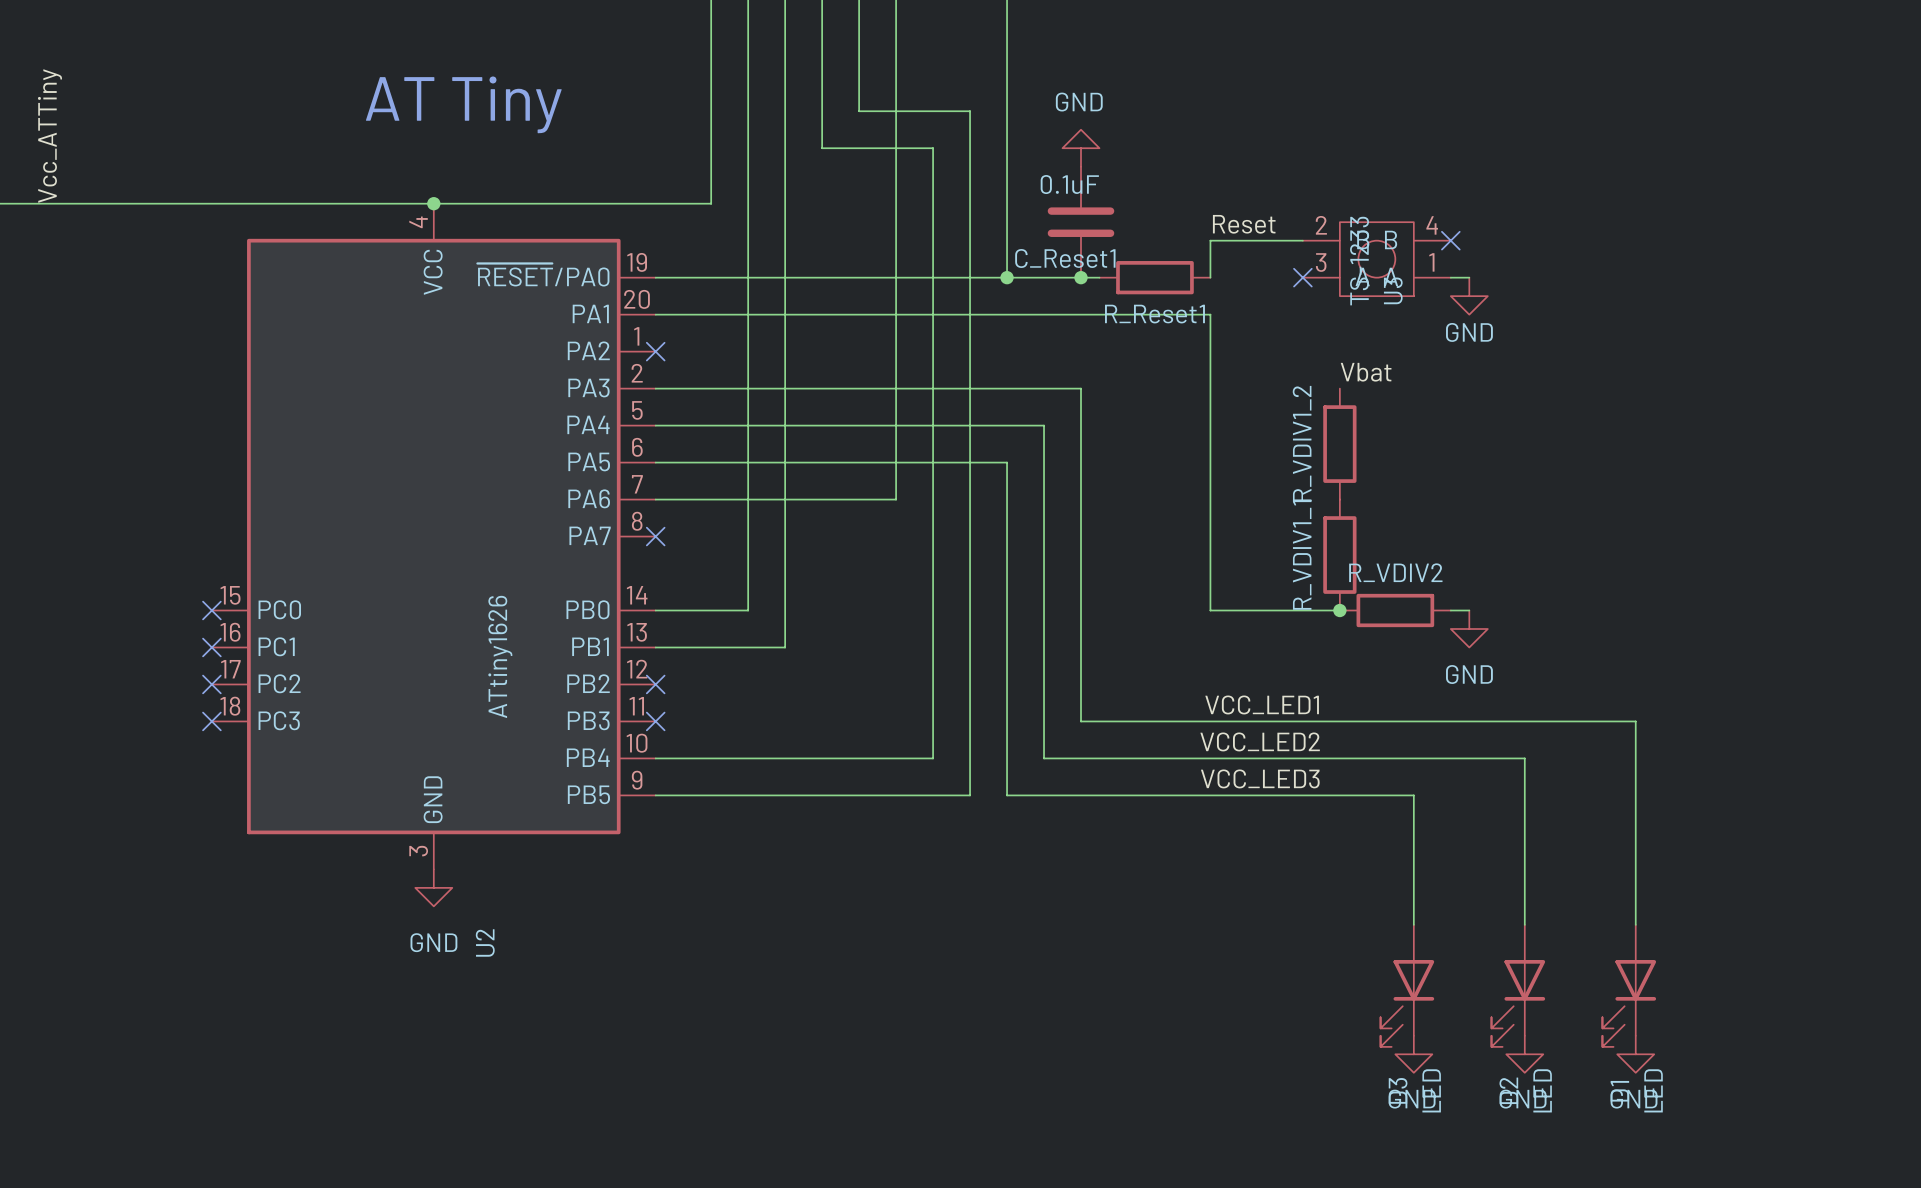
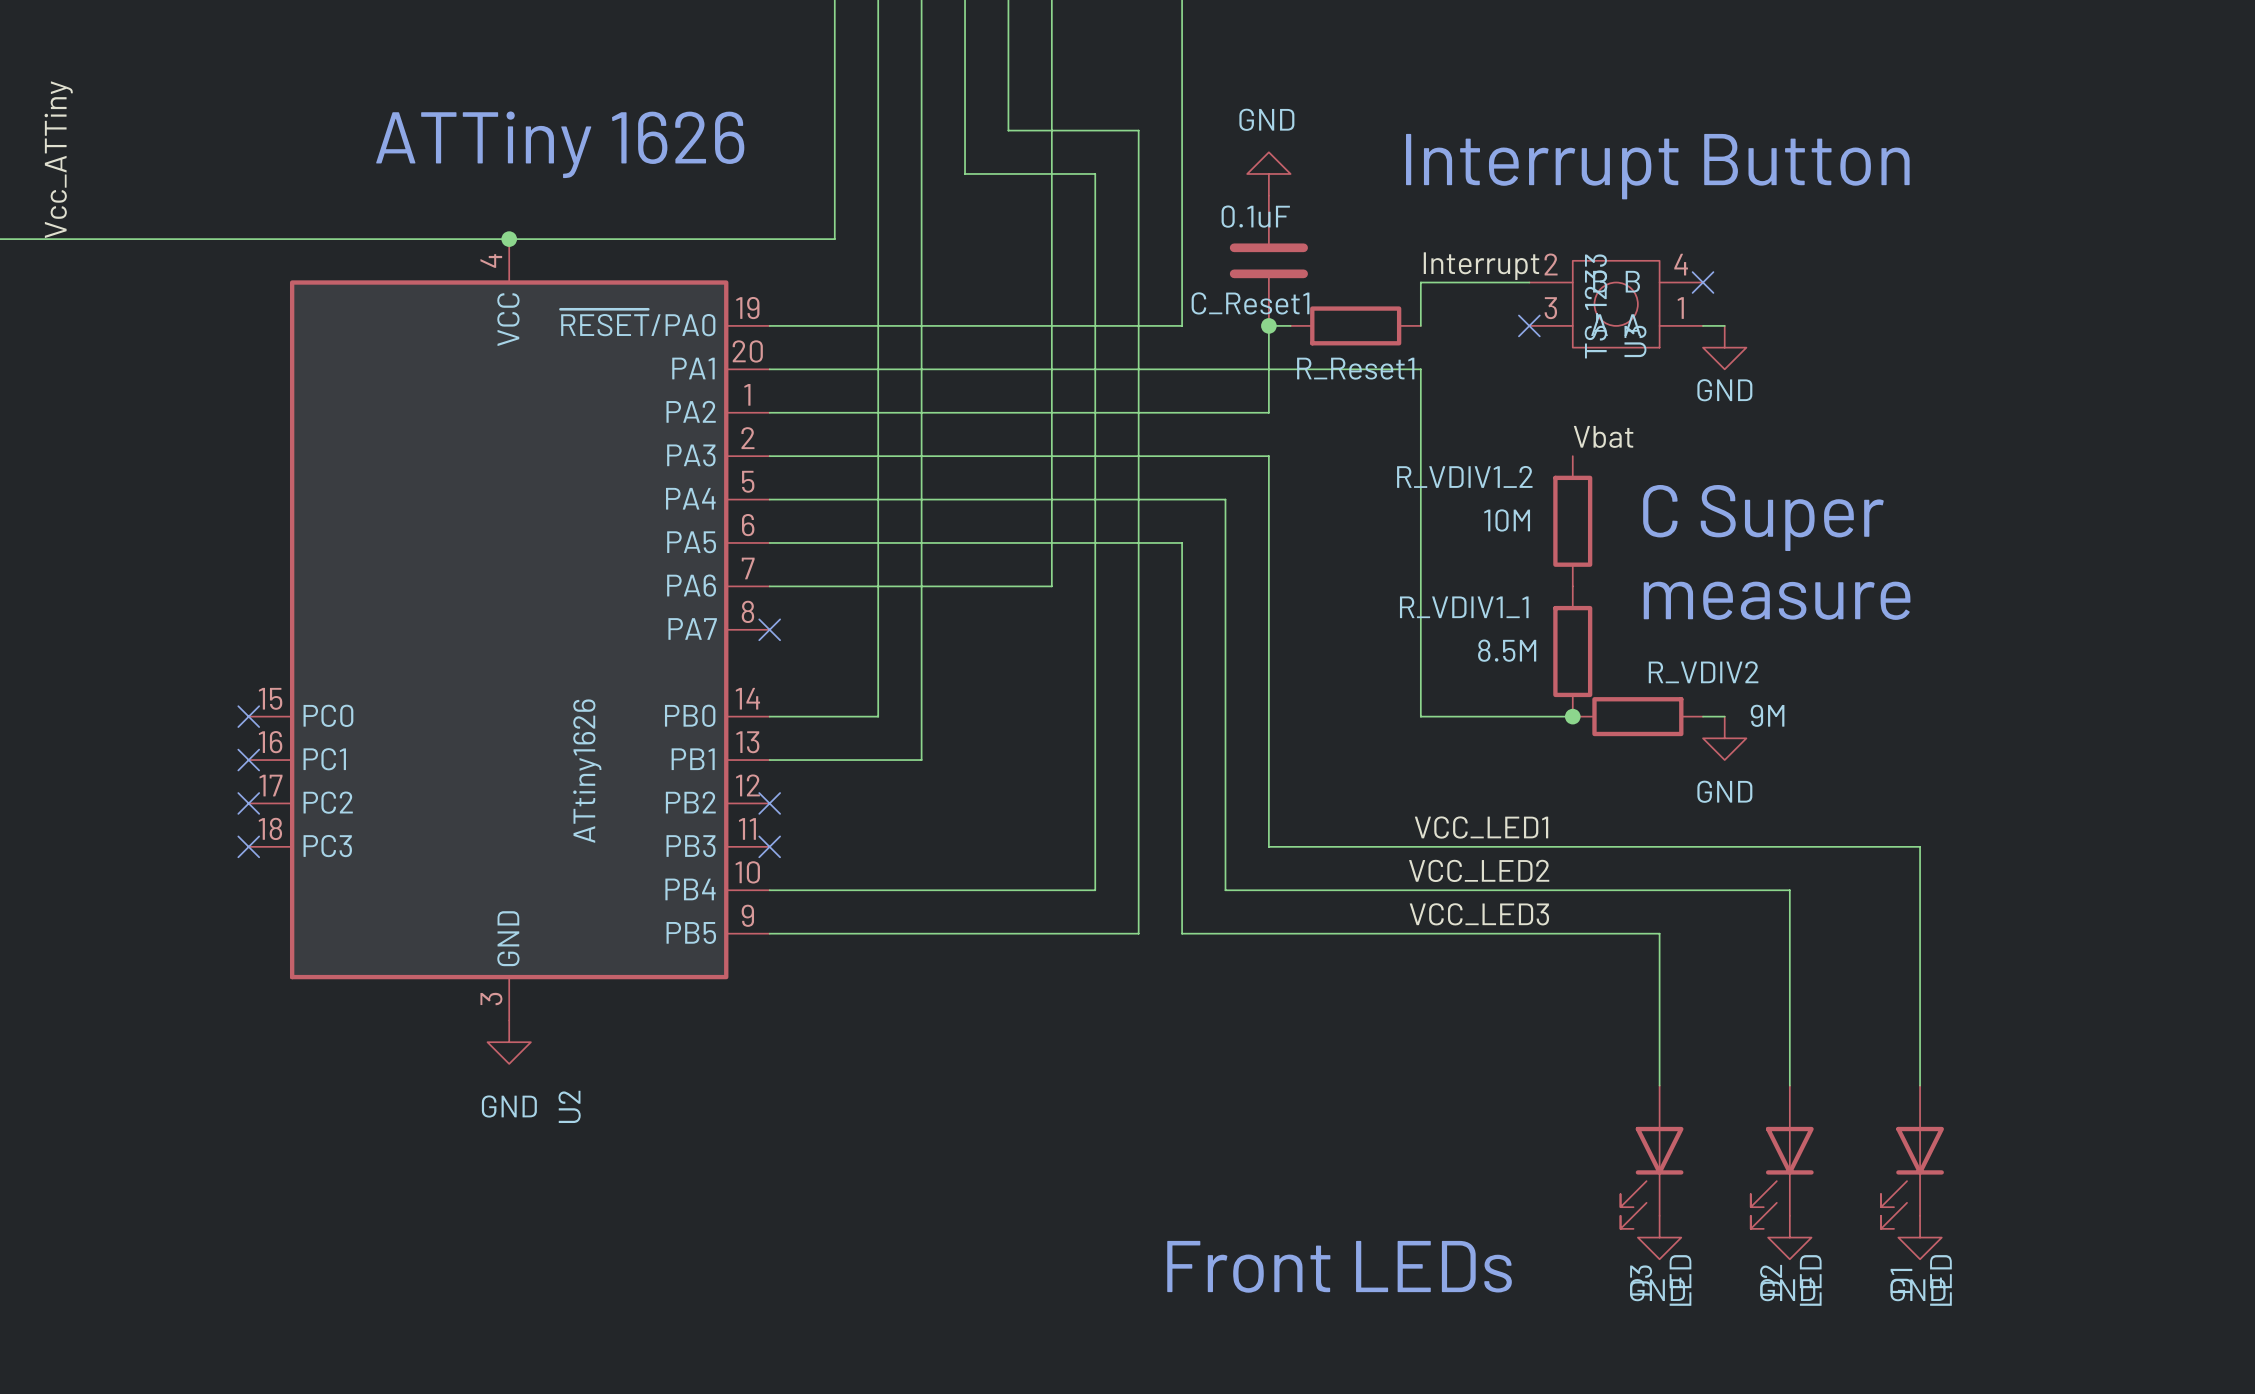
text: AT Tiny (463, 104) -> ATTiny 1626 (560, 144)
text: none -> Interrupt Button (1657, 166)
label: Reset (1244, 224) -> Interrupt (1481, 266)
wire: (1007, 277) (1081, 277) -> (769, 412) (1268, 412) (1268, 325)
junction: (1007, 277) -> none
no-connect mark: (655, 351) -> none
text: none -> C Super (1763, 517)
R_VDIV1_2 value: none -> 10M (1507, 520)
R_VDIV1_2 name rotation: 0° (1302, 443) -> 90° clockwise (1464, 476)
text: none -> measure (1777, 600)
R_VDIV1_1 value: none -> 8.5M (1507, 650)
R_VDIV1_1 name rotation: 0° (1302, 555) -> 90° clockwise (1464, 607)
R_VDIV2 name position: R_VDIV2 (1395, 572) -> R_VDIV2 (1703, 672)
R_VDIV2 value: none -> 9M (1767, 715)
text: none -> Front LEDs (1339, 1266)

